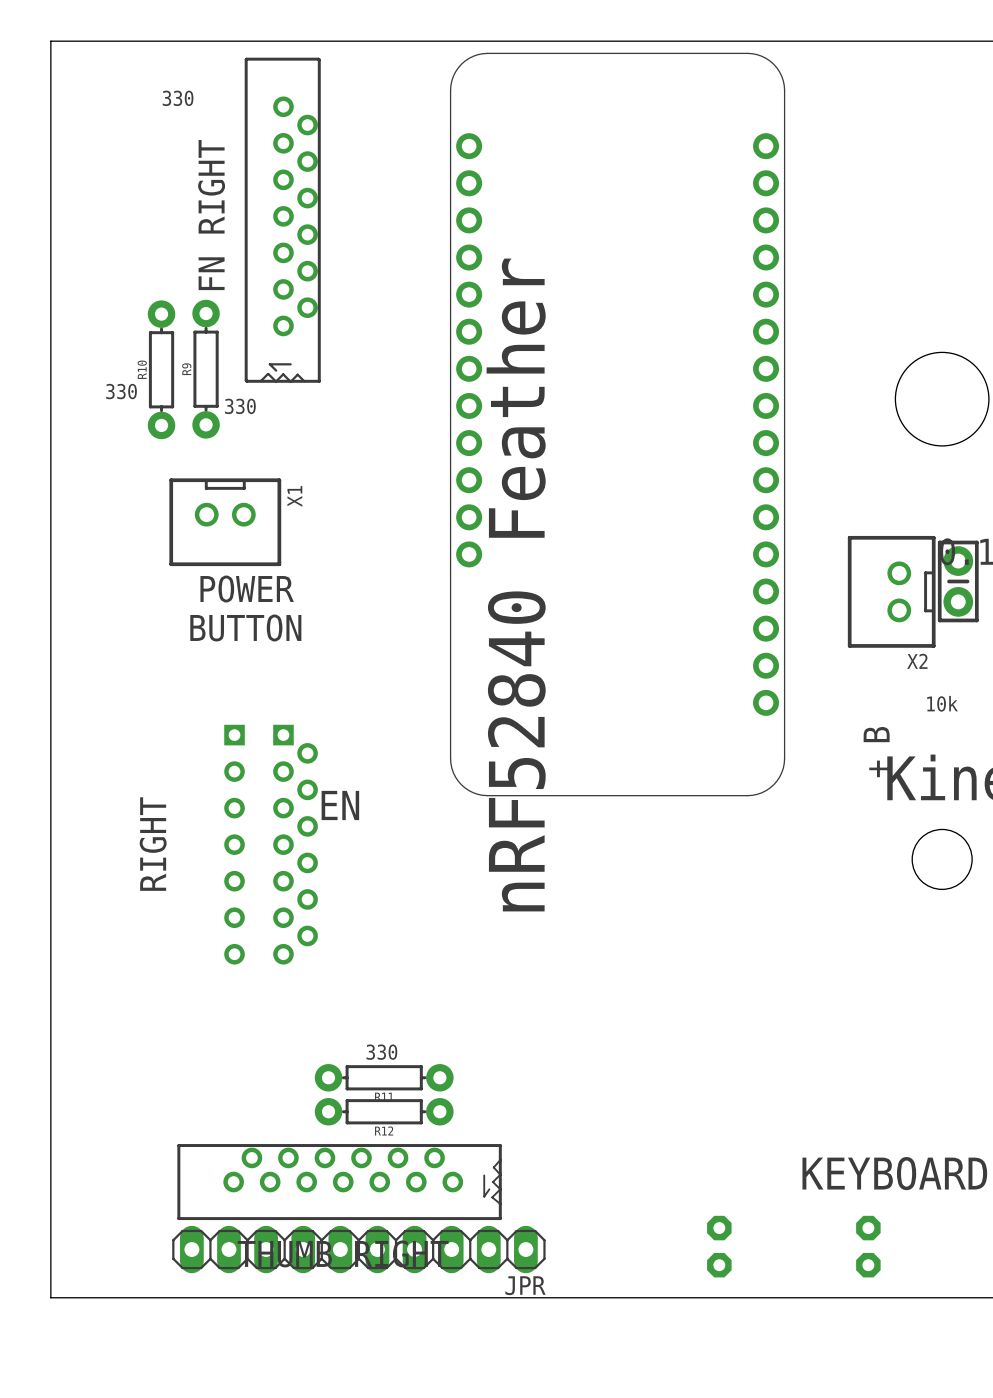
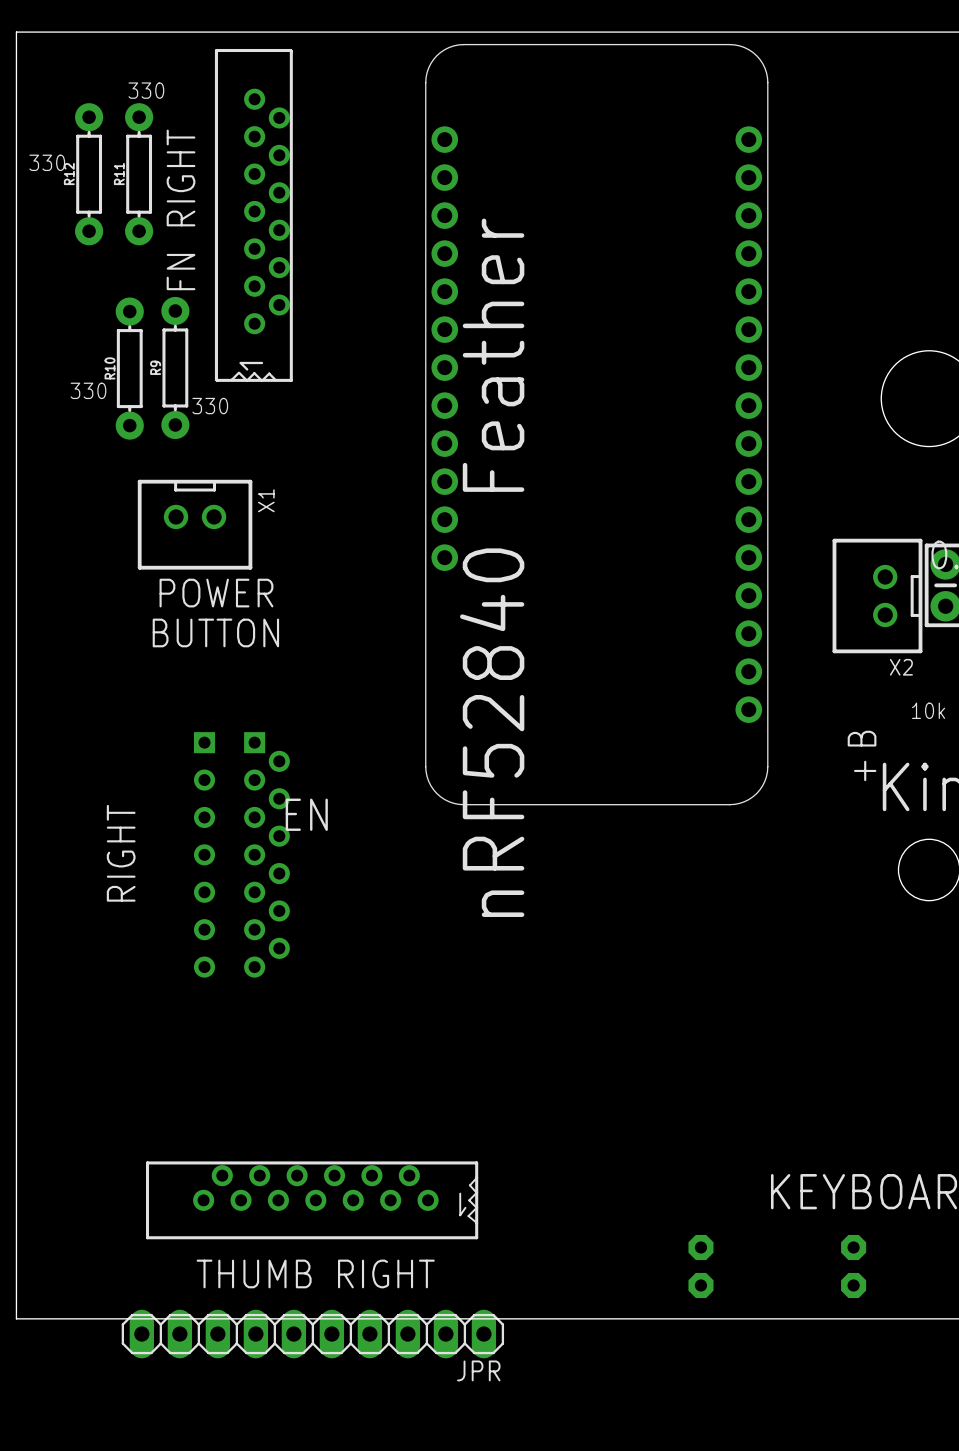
text: none -> 330 (47, 162)
text: 330 (381, 1052) -> none
R11 rotation: 0° (384, 1077) -> 90° clockwise (139, 174)
R11 position: (384, 1077) -> (139, 174)
R12 rotation: 0° (384, 1111) -> 90° clockwise (89, 174)
R12 position: (384, 1111) -> (89, 174)
JPR position: (358, 1249) -> (312, 1334)

